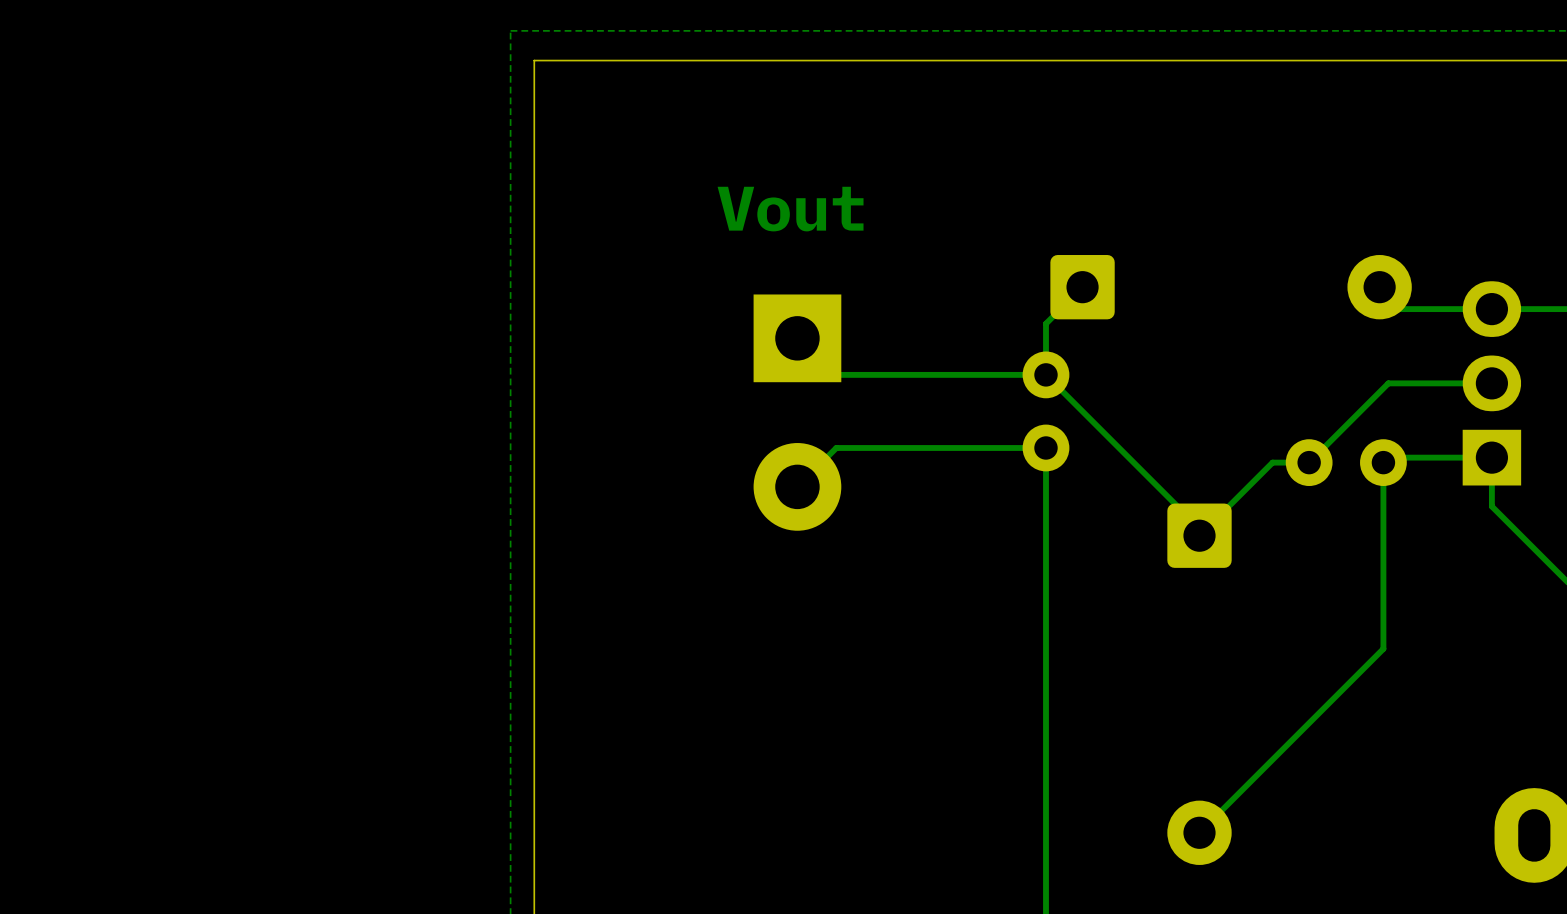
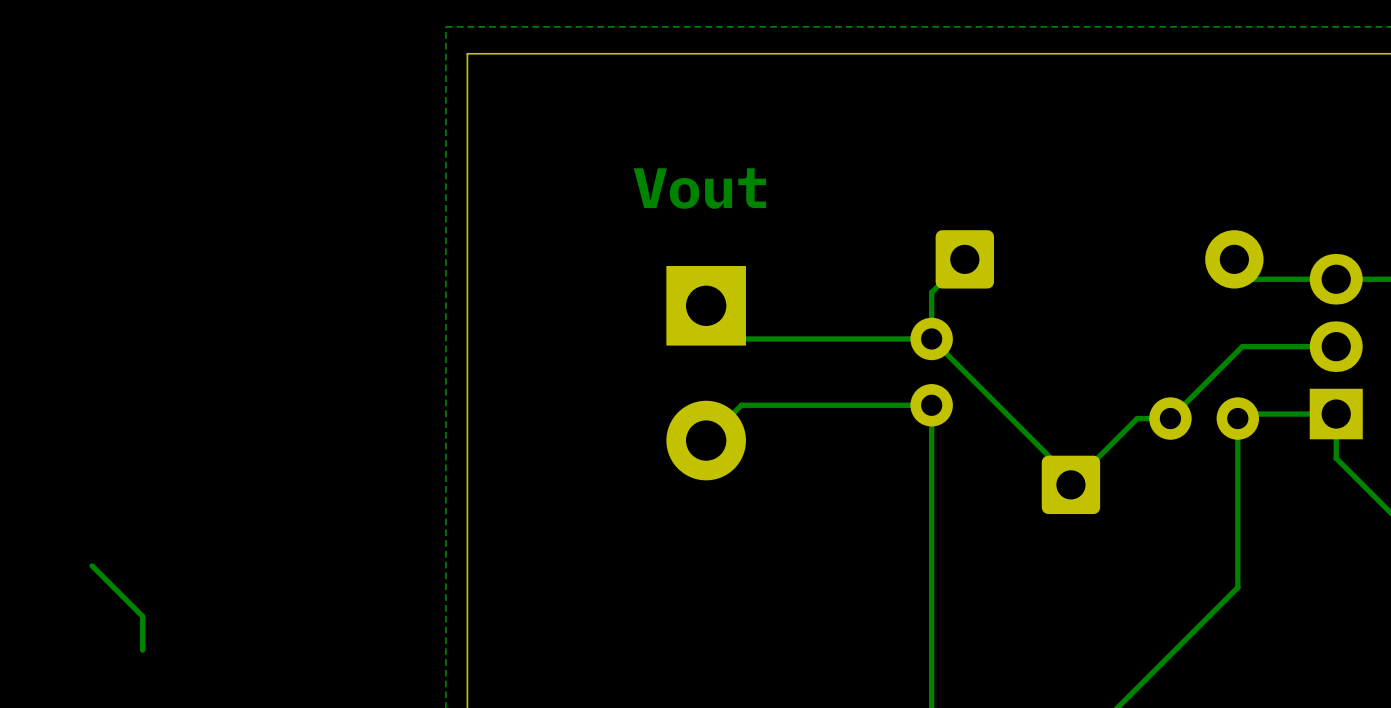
bottom track: none -> (92, 565) (142, 616) (142, 650)

